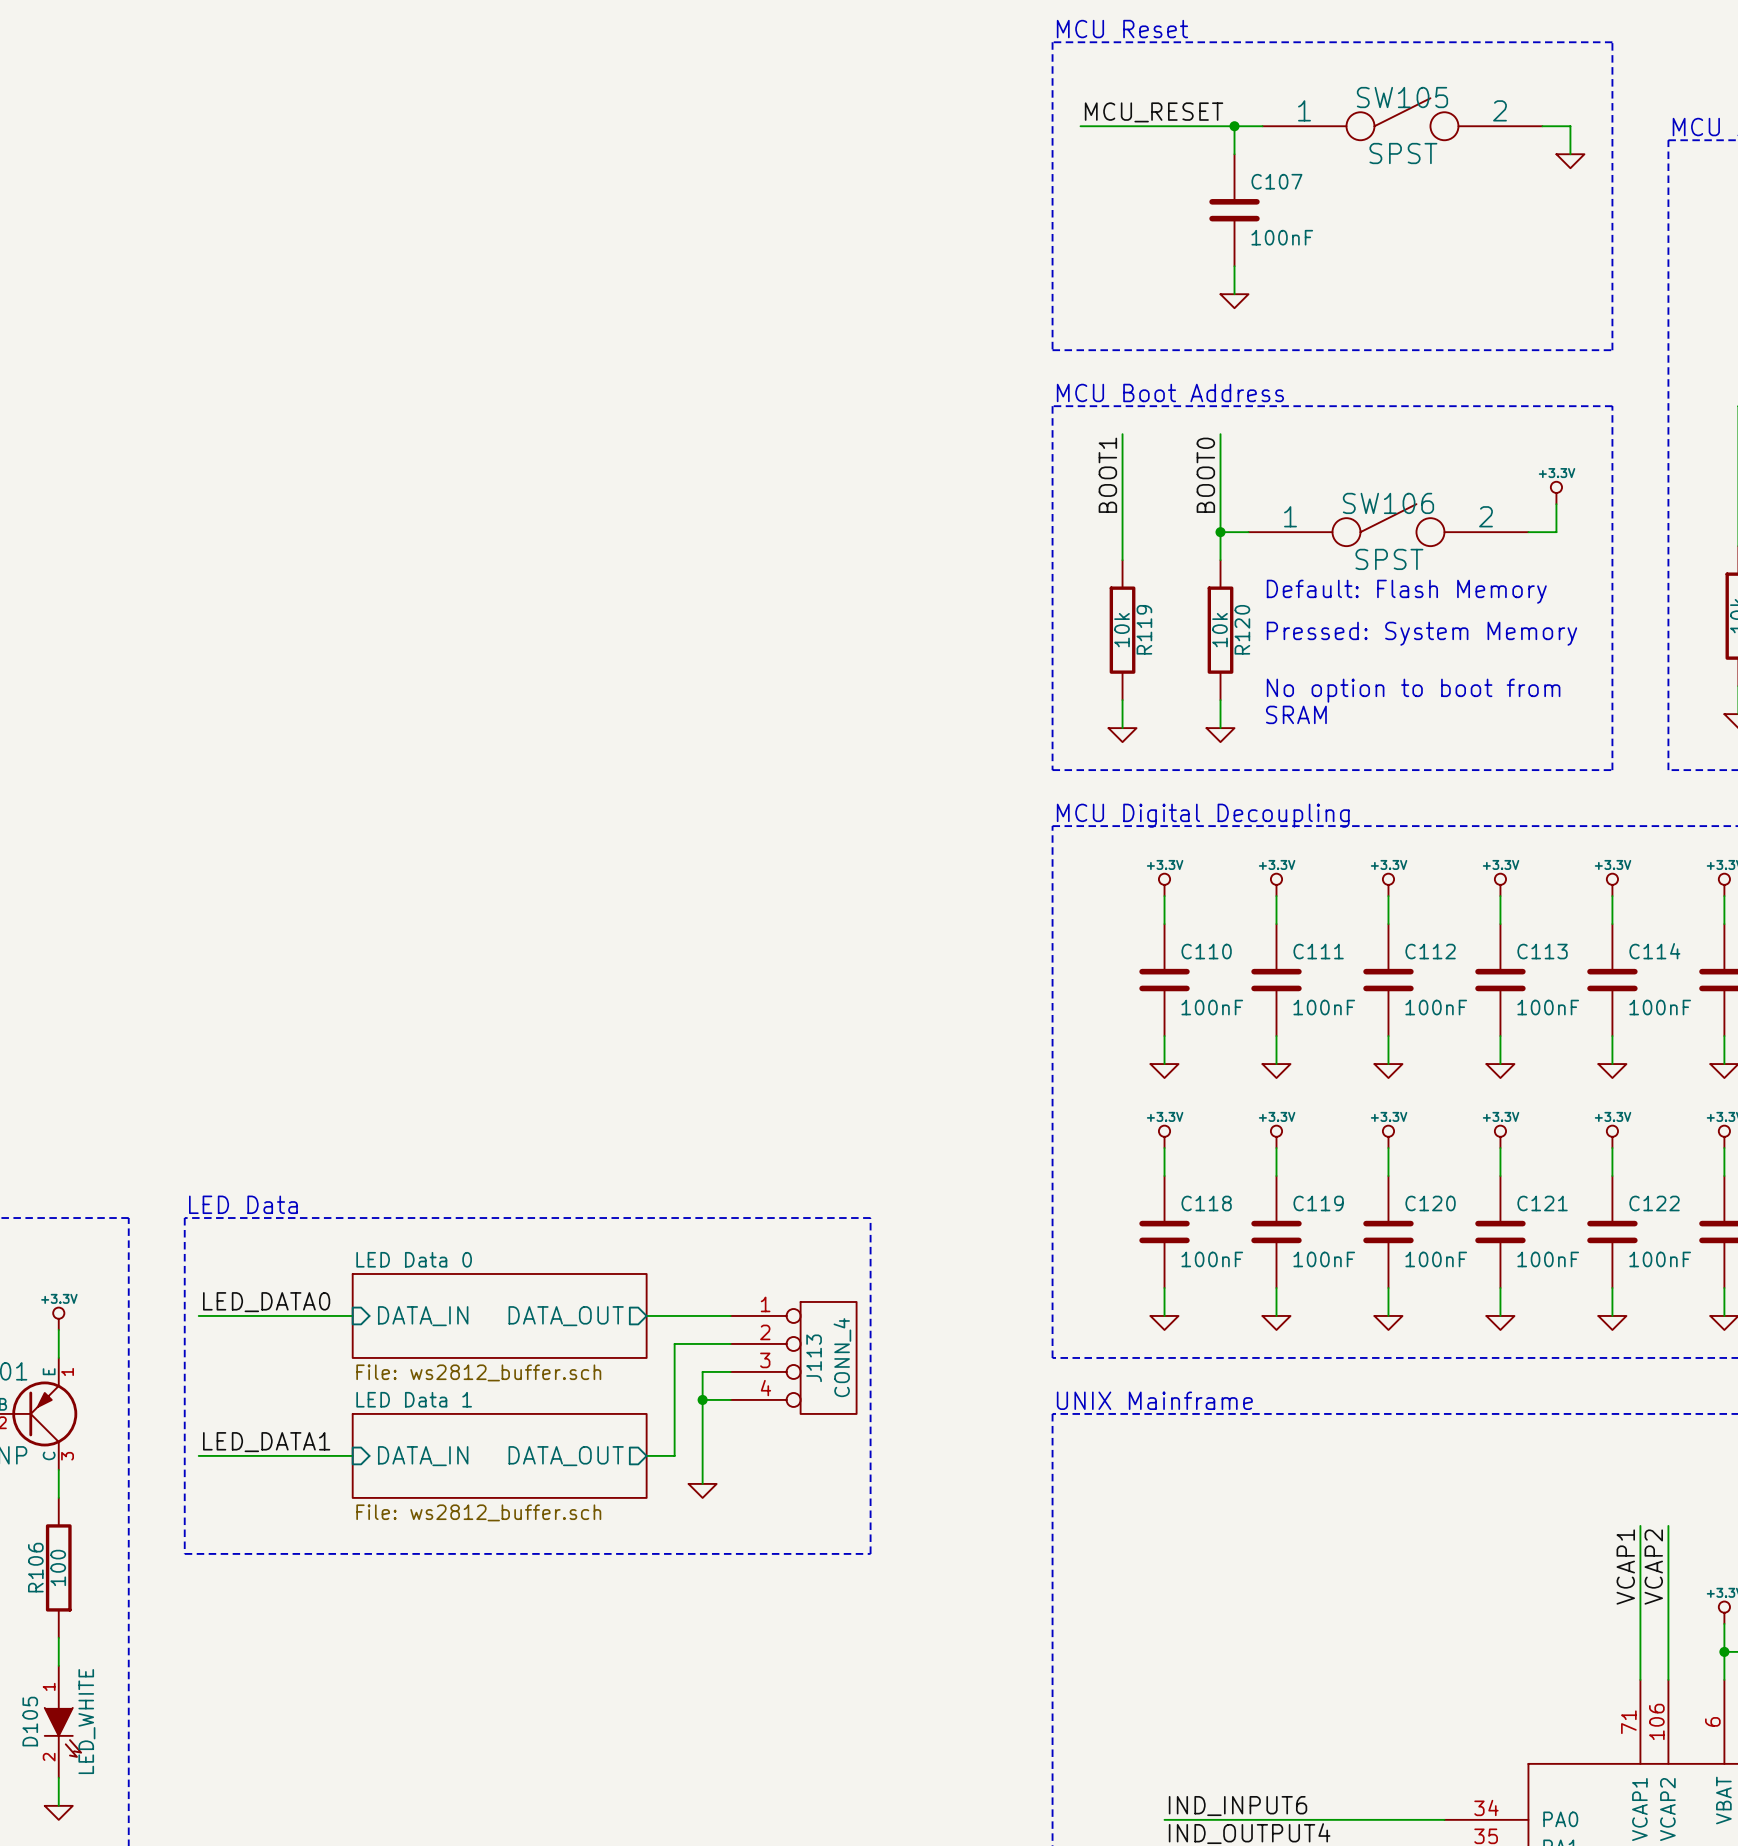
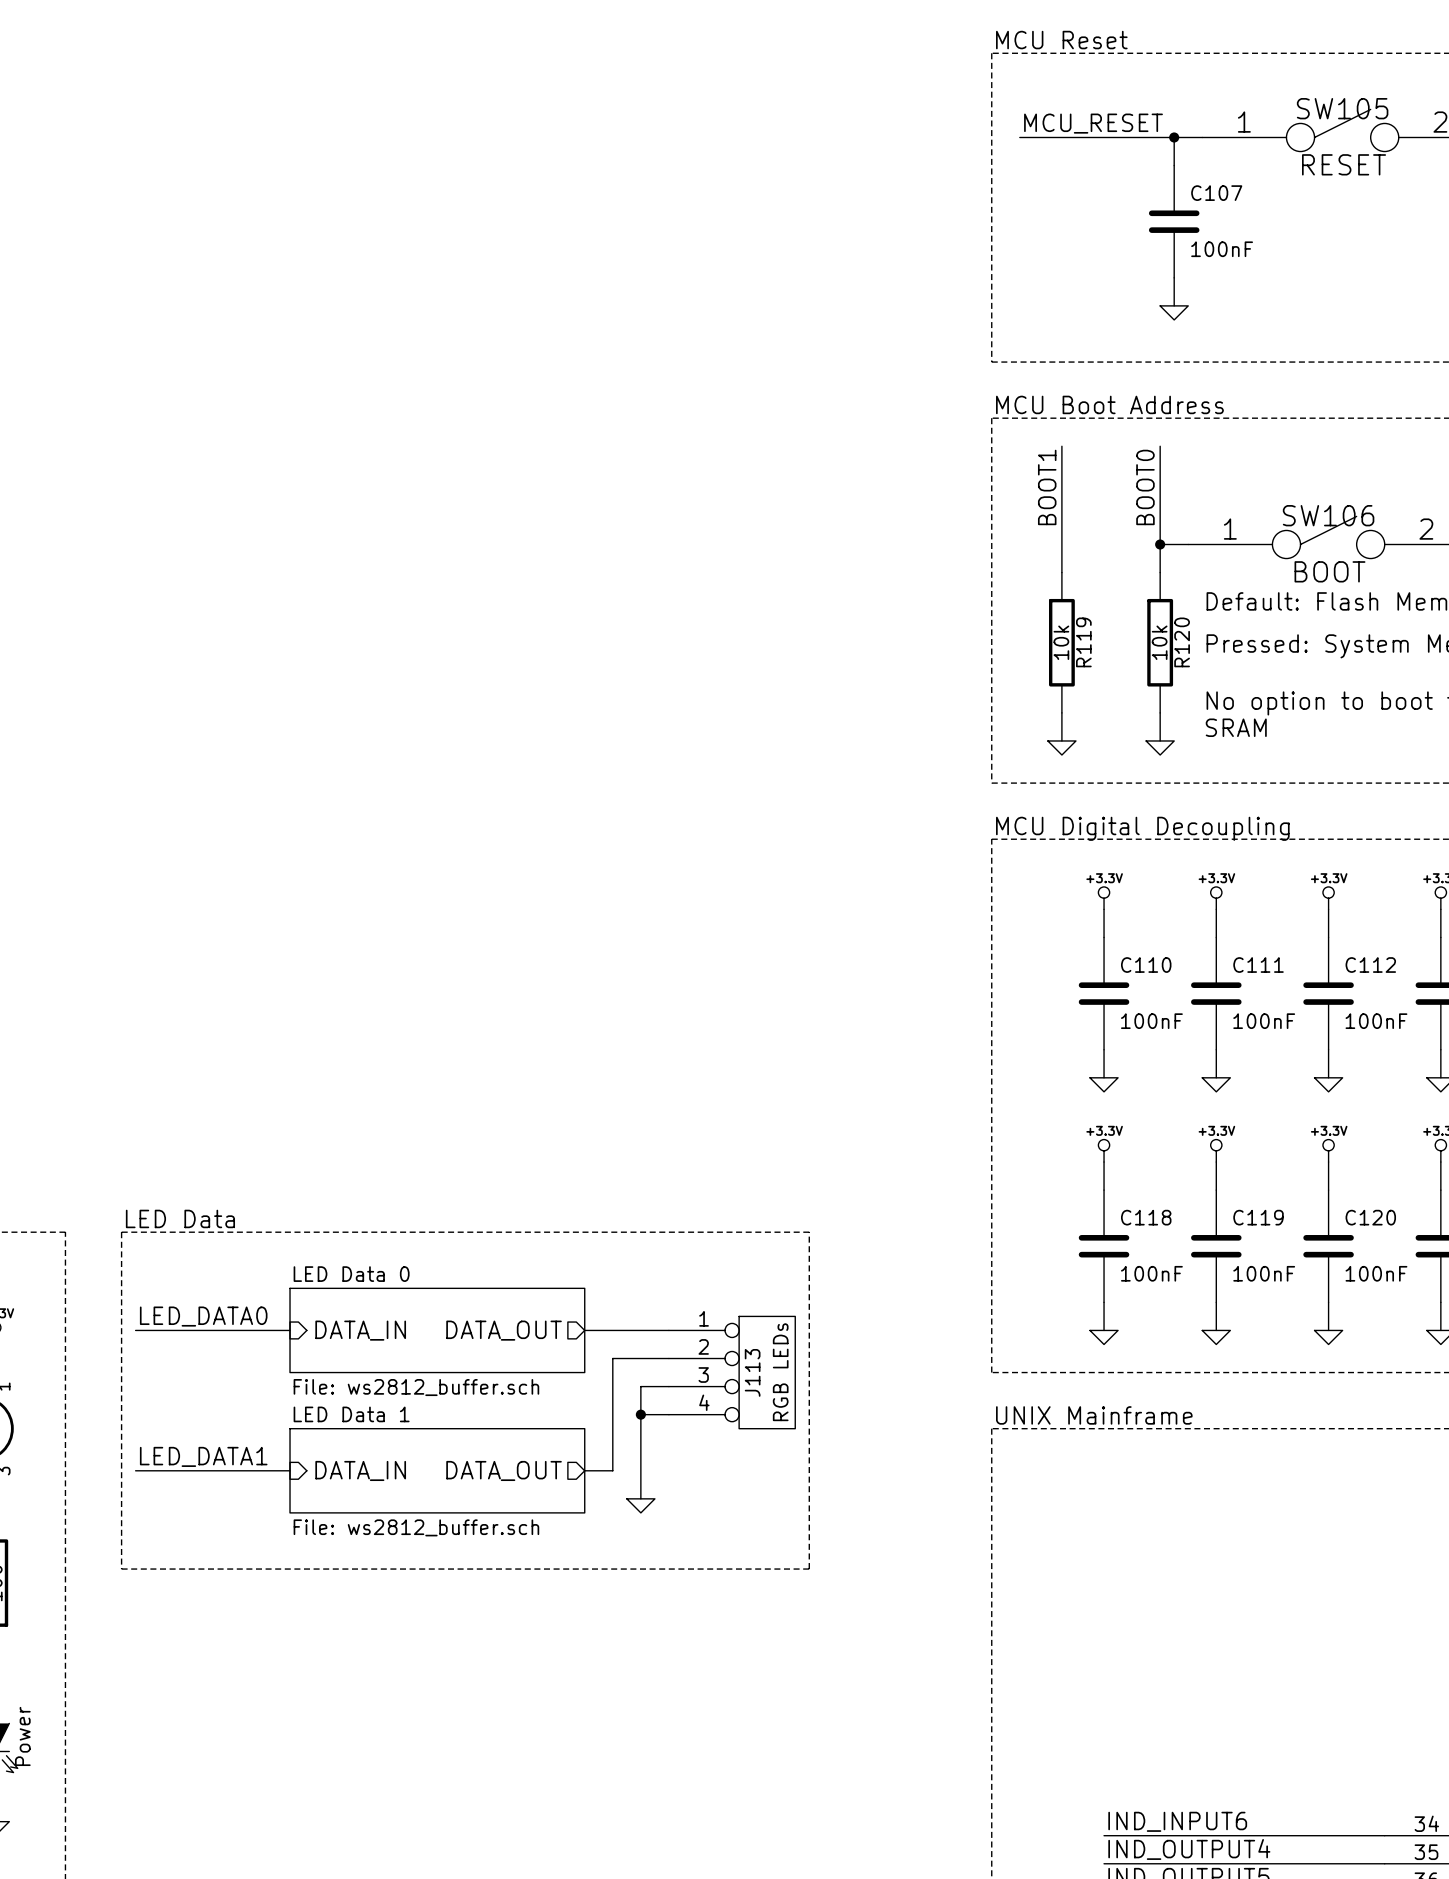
SW105 value: SPST (1403, 153) -> RESET (1344, 164)
SW106 value: SPST (1389, 559) -> BOOT (1329, 571)
J113 value: CONN_4 (842, 1357) -> RGB LEDs (780, 1372)
D105 value: LED_WHITE (86, 1721) -> Power (22, 1736)

